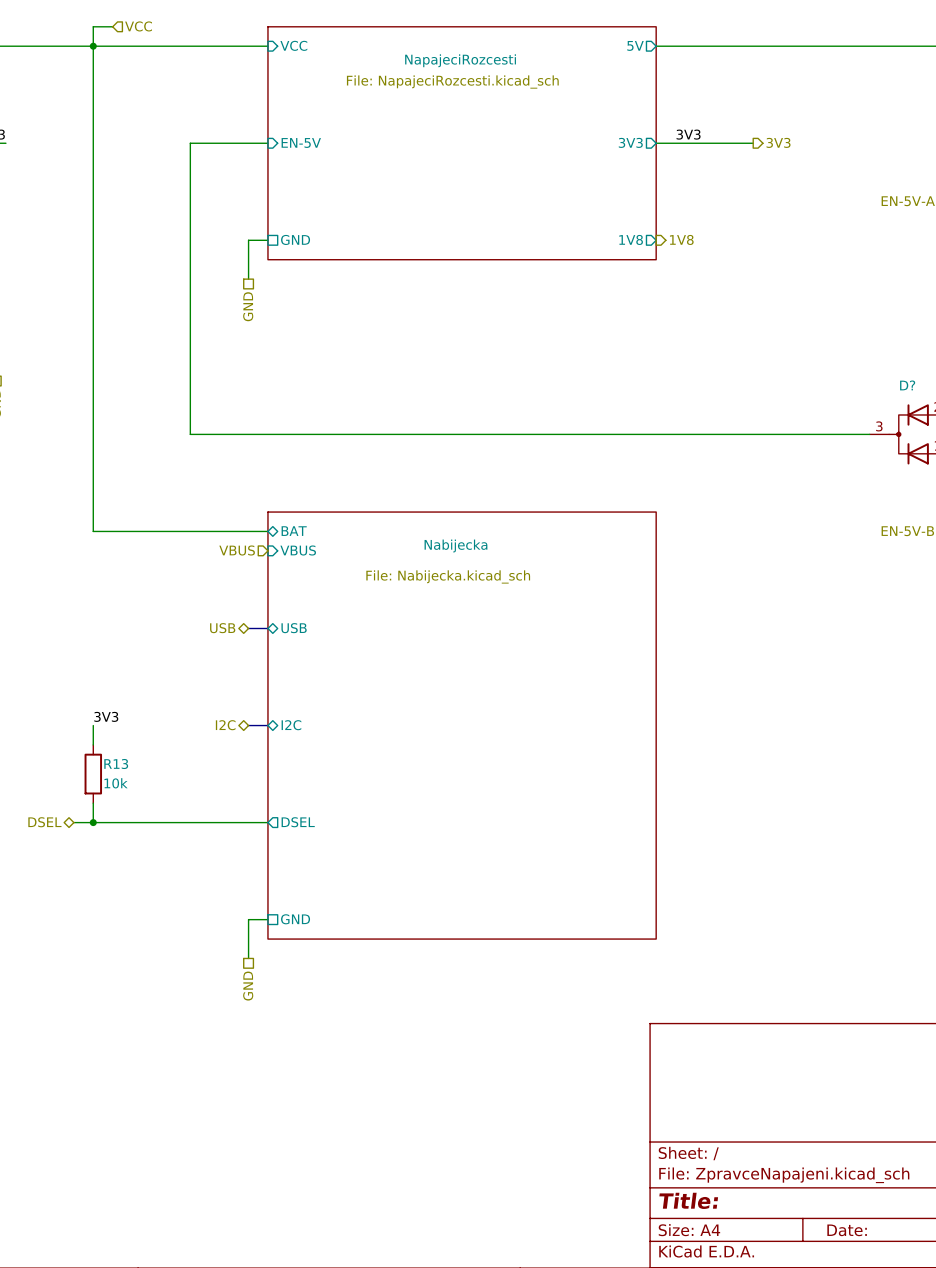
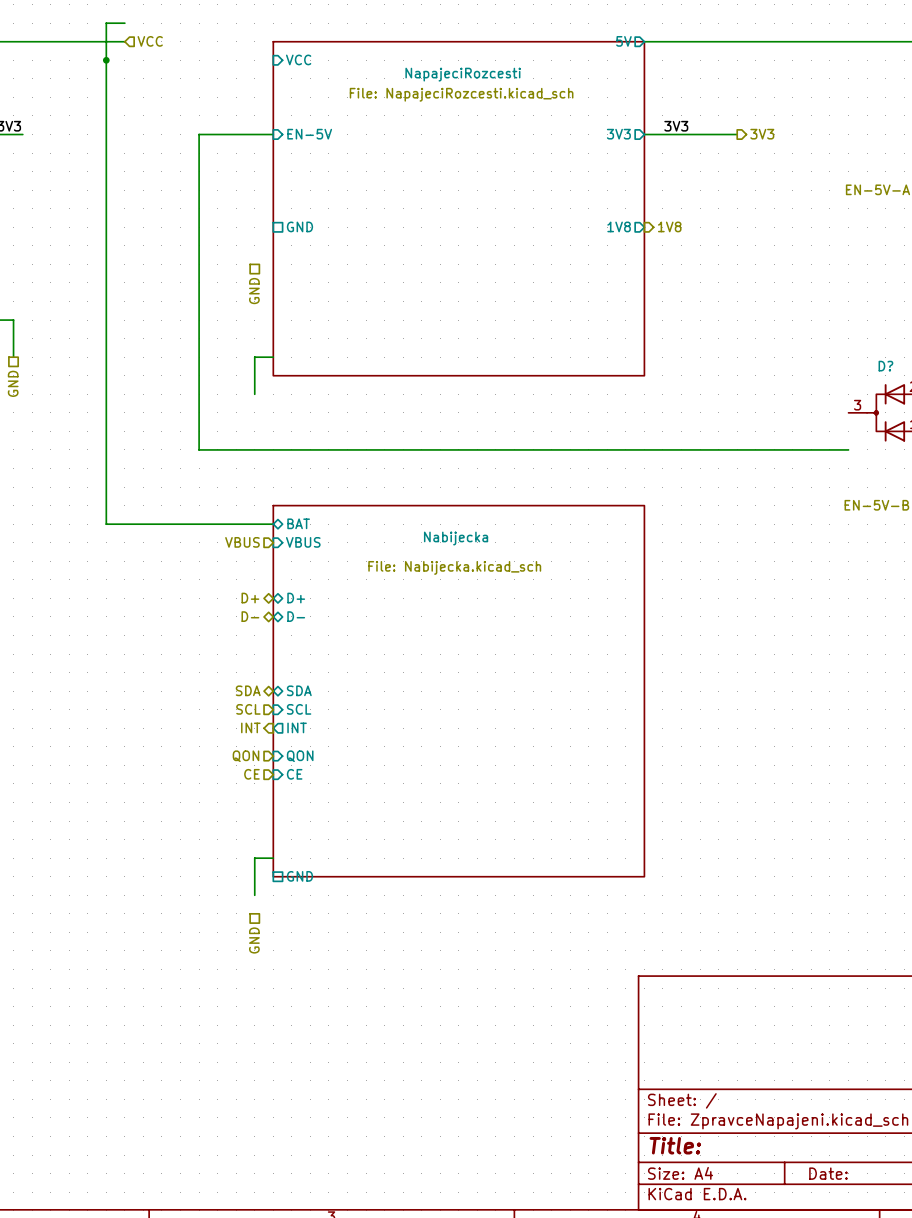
hierarchical label position: VCC (138, 26) -> VCC (150, 41)
sheet pin position: VCC (293, 45) -> VCC (298, 59)
junction position: (93, 46) -> (106, 60)
wire: (112, 46) (267, 46) -> none
sheet NapajeciRozcesti: File: NapajeciRozcesti.kicad_sch (462, 143) -> none
sheet NapajeciRozcesti: none -> File: NapajeciRozcesti.kicad_sch (458, 208)
wire: (267, 240) (248, 240) (248, 279) -> (273, 357) (254, 357) (254, 394)
wire: (190, 434) (869, 434) -> (199, 412) (199, 449) (848, 449)
sheet Nabijecka shape: [267, 511, 657, 940] -> [272, 505, 645, 878]
wire: (93, 531) (267, 531) -> (106, 505) (106, 524) (273, 524)
sheet pin: BAT (294, 531) -> none
sheet Nabijecka name position: Nabijecka (455, 546) -> Nabijecka (456, 538)
hierarchical label position: VBUS (237, 550) -> VBUS (242, 542)
sheet pin shape: input (298, 550) -> bidirectional (298, 523)
sheet pin: VBUS (298, 550) -> BAT (298, 523)
sheet pin: none -> VBUS (303, 542)
sheet Nabijecka value position: File: Nabijecka.kicad_sch (448, 576) -> File: Nabijecka.kicad_sch (454, 567)
hierarchical label: USB (222, 628) -> none
hierarchical label: none -> D+ (250, 598)
bus: (248, 628) (267, 628) -> none
sheet pin: USB (294, 628) -> D+ (296, 598)
hierarchical label: none -> D- (250, 616)
sheet pin: none -> D- (296, 616)
label: 3V3 (106, 716) -> none
wire: (93, 725) (93, 744) -> none
hierarchical label: I2C (225, 725) -> none
hierarchical label: none -> SDA (248, 690)
bus: (248, 725) (267, 725) -> none
sheet pin: I2C (291, 725) -> SDA (299, 690)
hierarchical label: none -> SCL (248, 709)
sheet pin: none -> SCL (299, 709)
hierarchical label: none -> INT (250, 727)
sheet pin: none -> INT (297, 727)
R13: 10k (93, 774) -> none
hierarchical label: none -> QON (245, 756)
sheet pin: none -> QON (300, 756)
wire: (93, 803) (93, 822) -> none
hierarchical label: none -> CE (251, 774)
sheet pin: none -> CE (294, 774)
hierarchical label: DSEL (44, 822) -> none
wire: (73, 822) (267, 822) -> none
junction: (93, 822) -> none
sheet pin: DSEL (298, 822) -> none
wire: (248, 919) (267, 919) -> (254, 876) (254, 858) (273, 858)
wire: (248, 939) (248, 958) -> none

